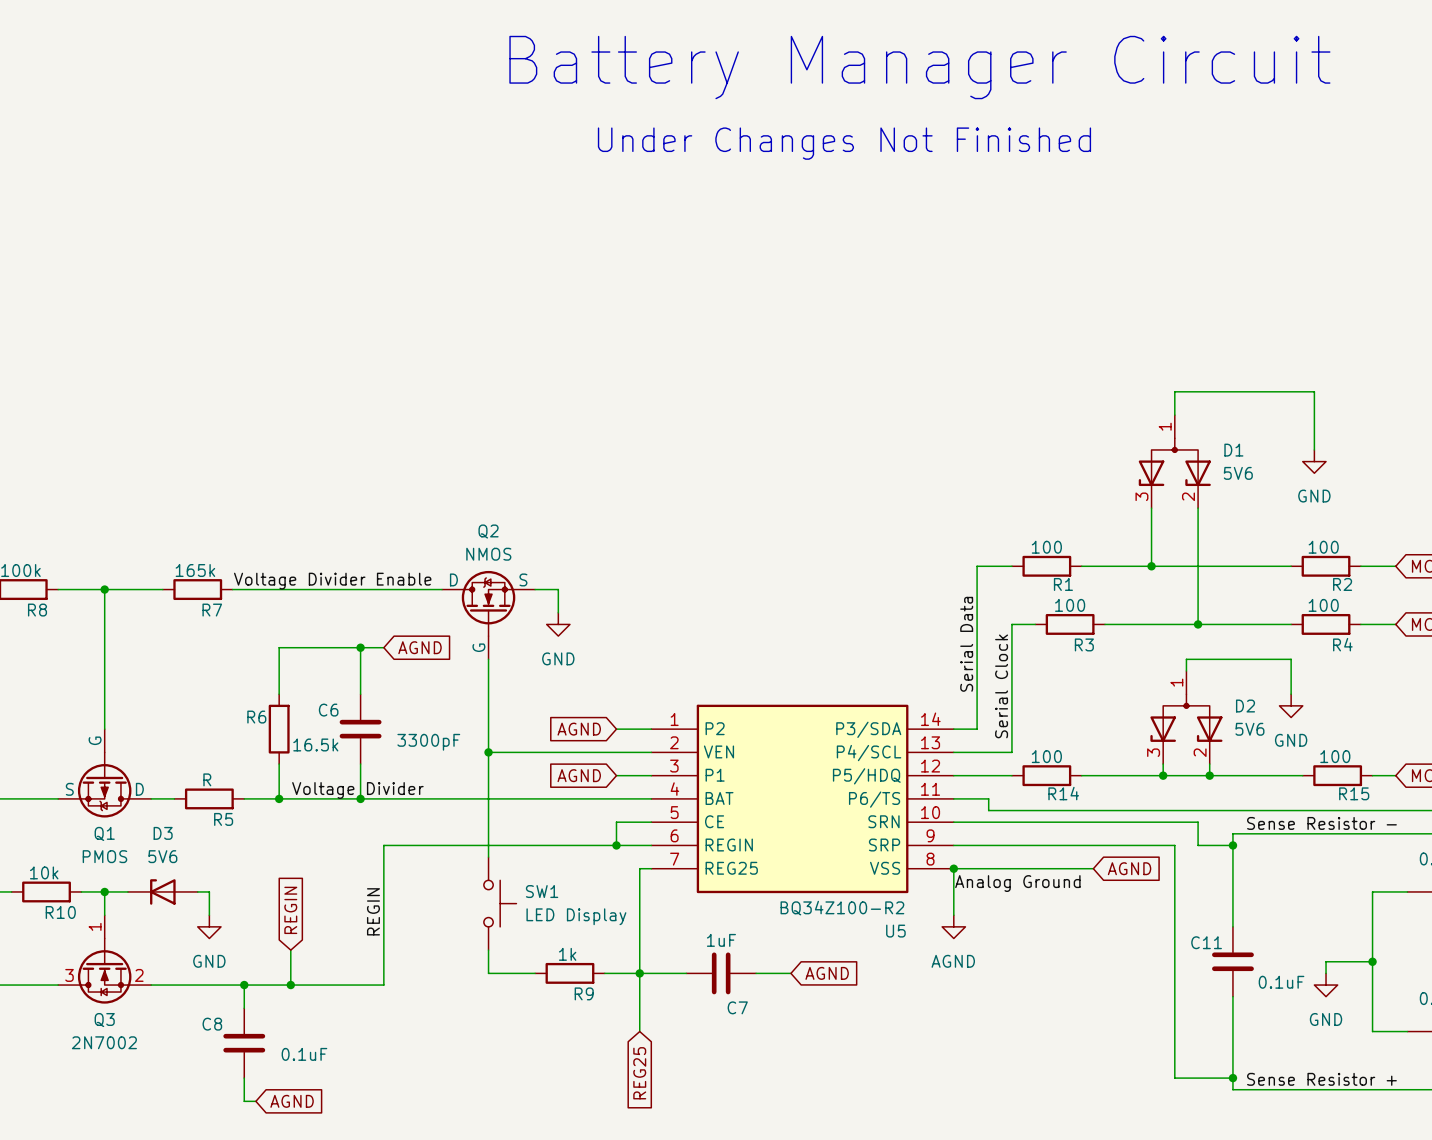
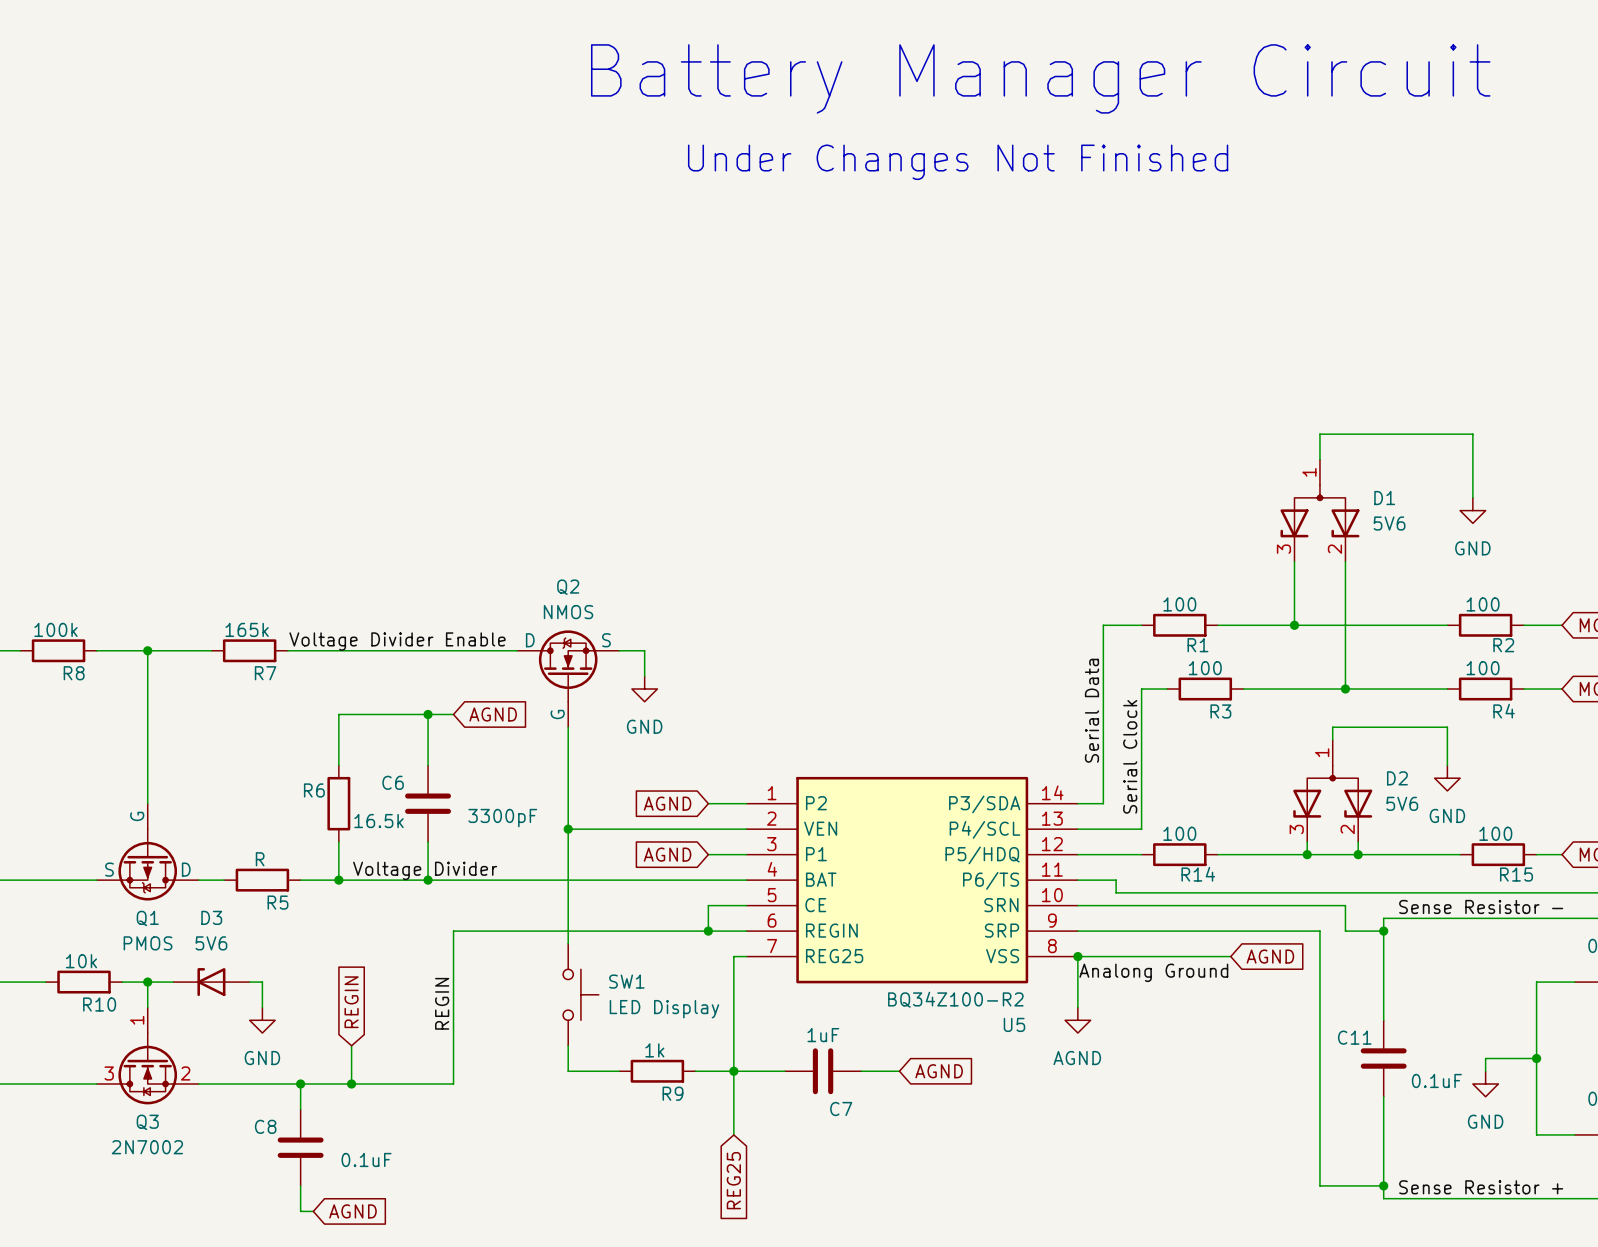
label: Analog Ground (1017, 883) -> Analong Ground (1153, 972)

